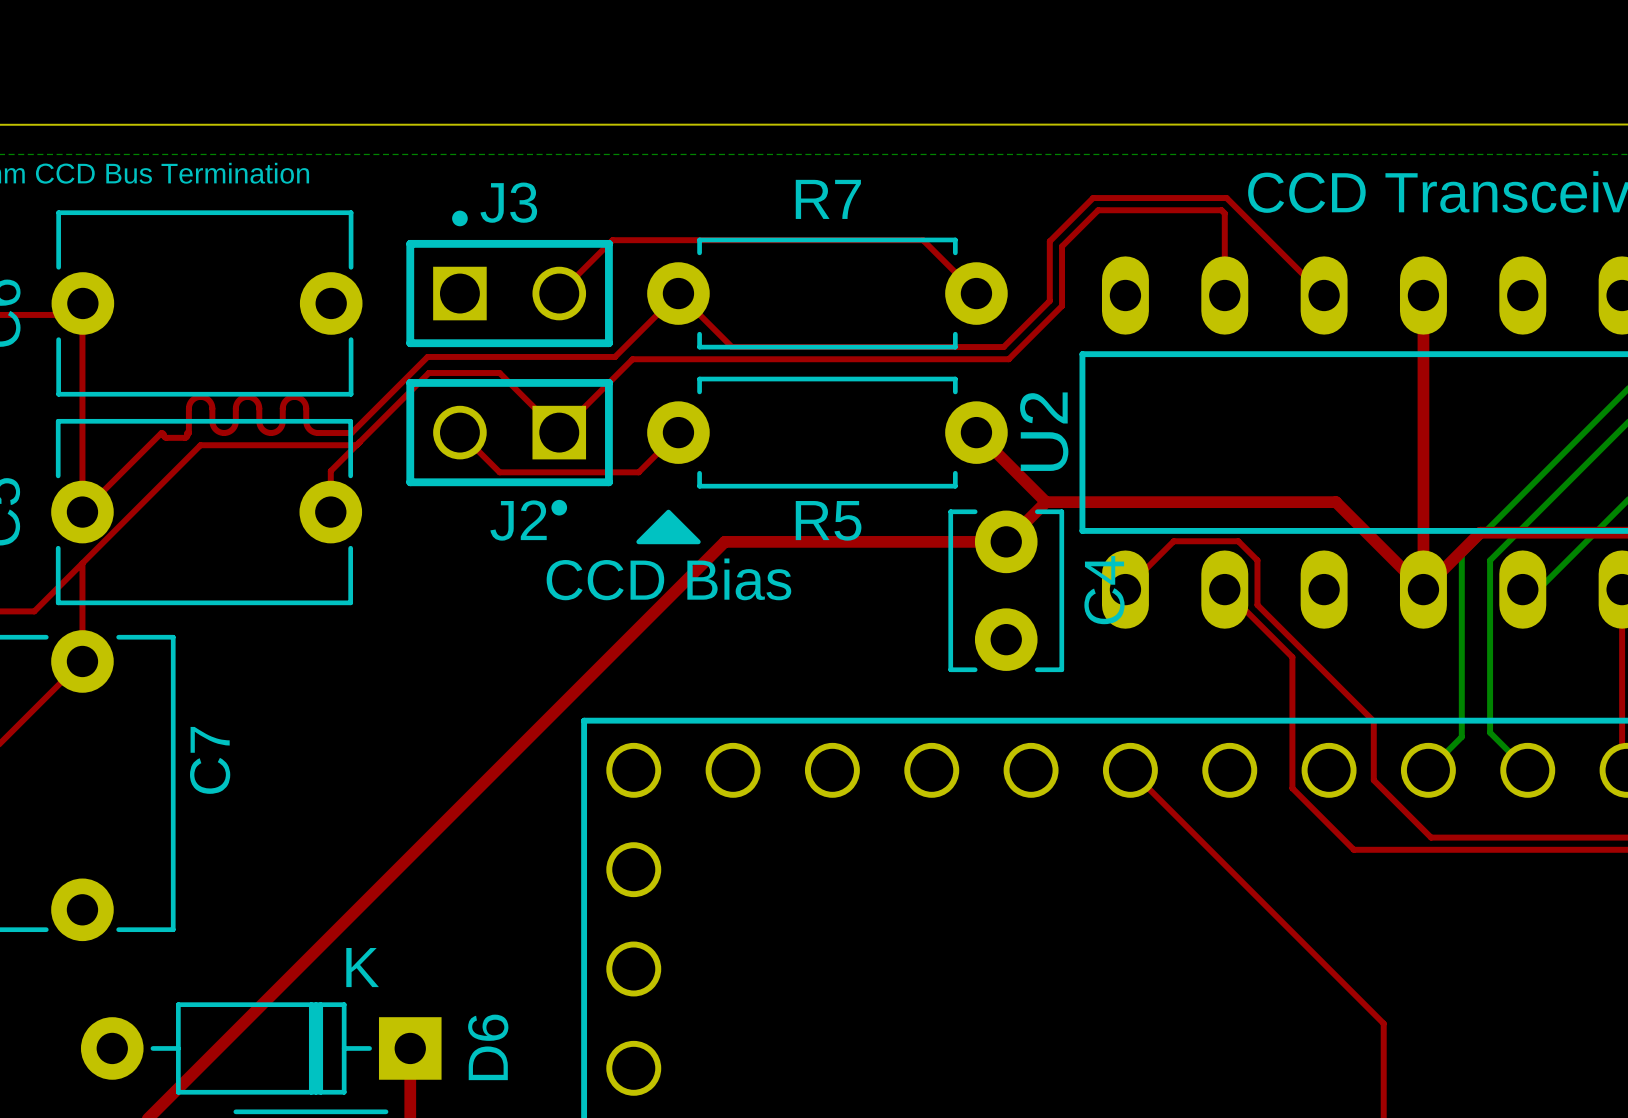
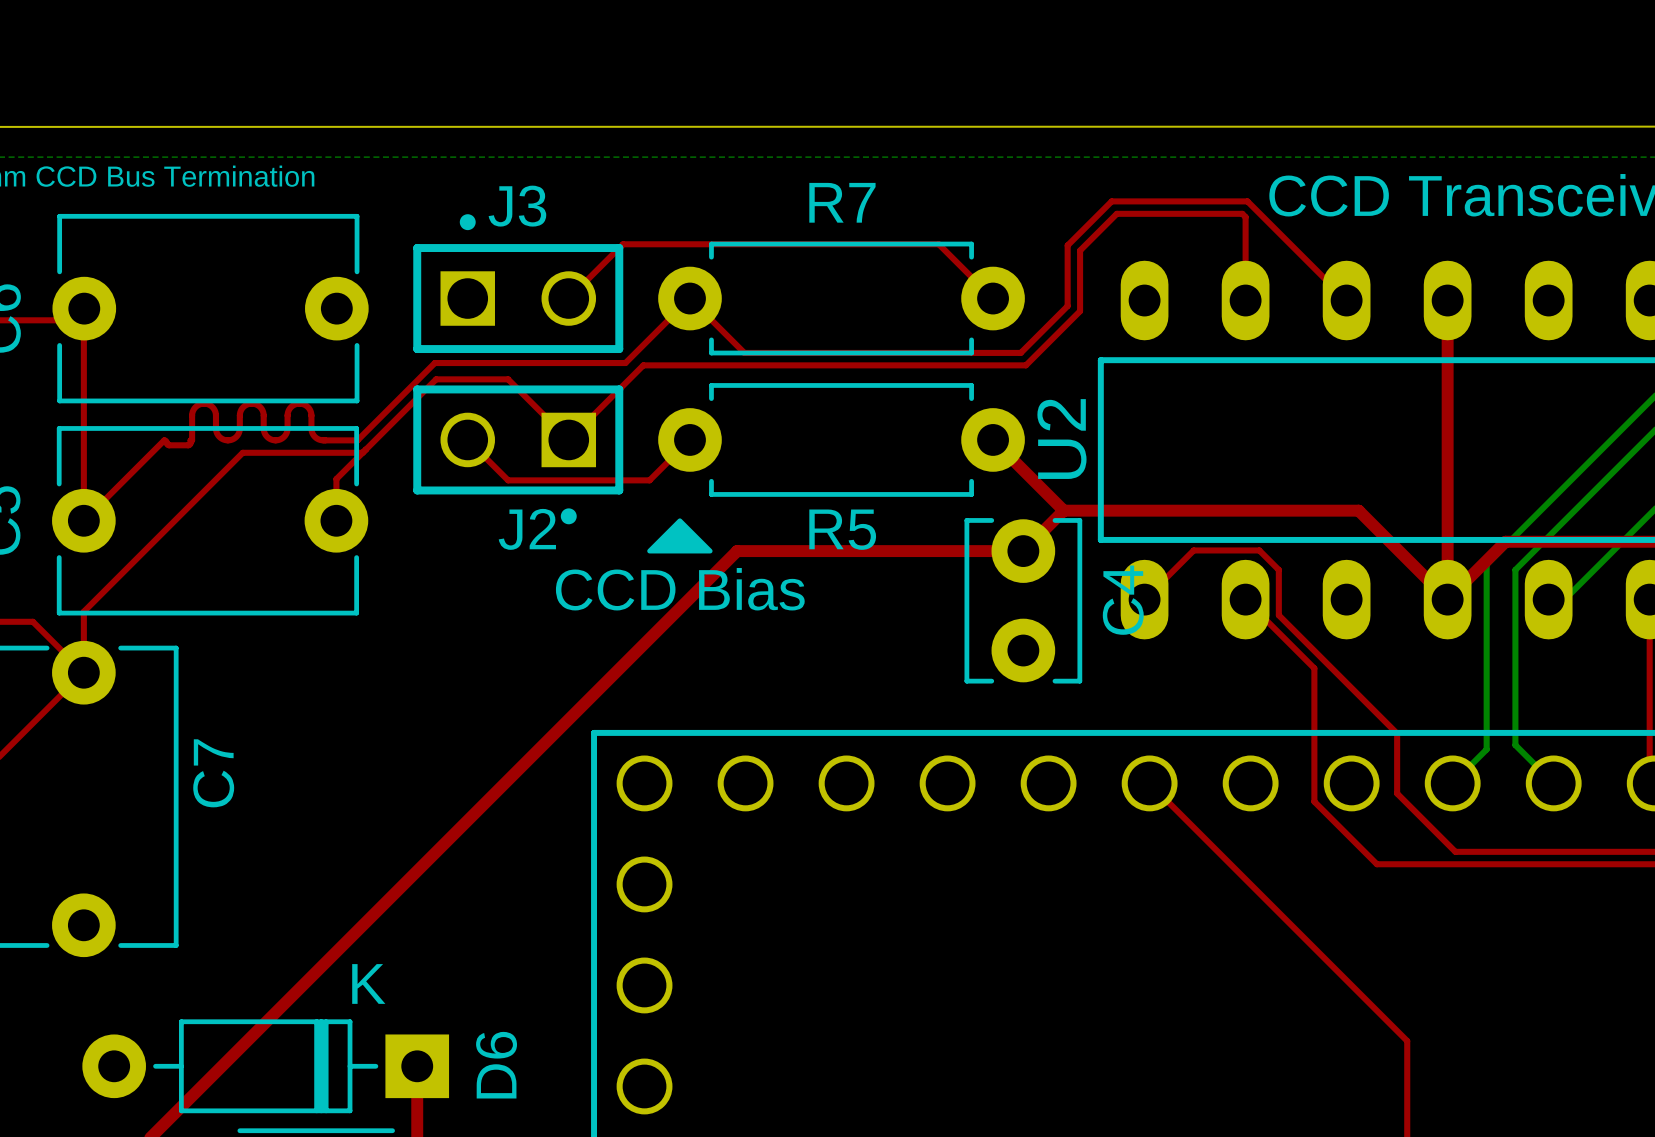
top track: (238, 445) (200, 445) (32, 611) -> (242, 452) (83, 611)
top track: (82, 563) (82, 601) -> none
top track: none -> (32, 621) (83, 672)

